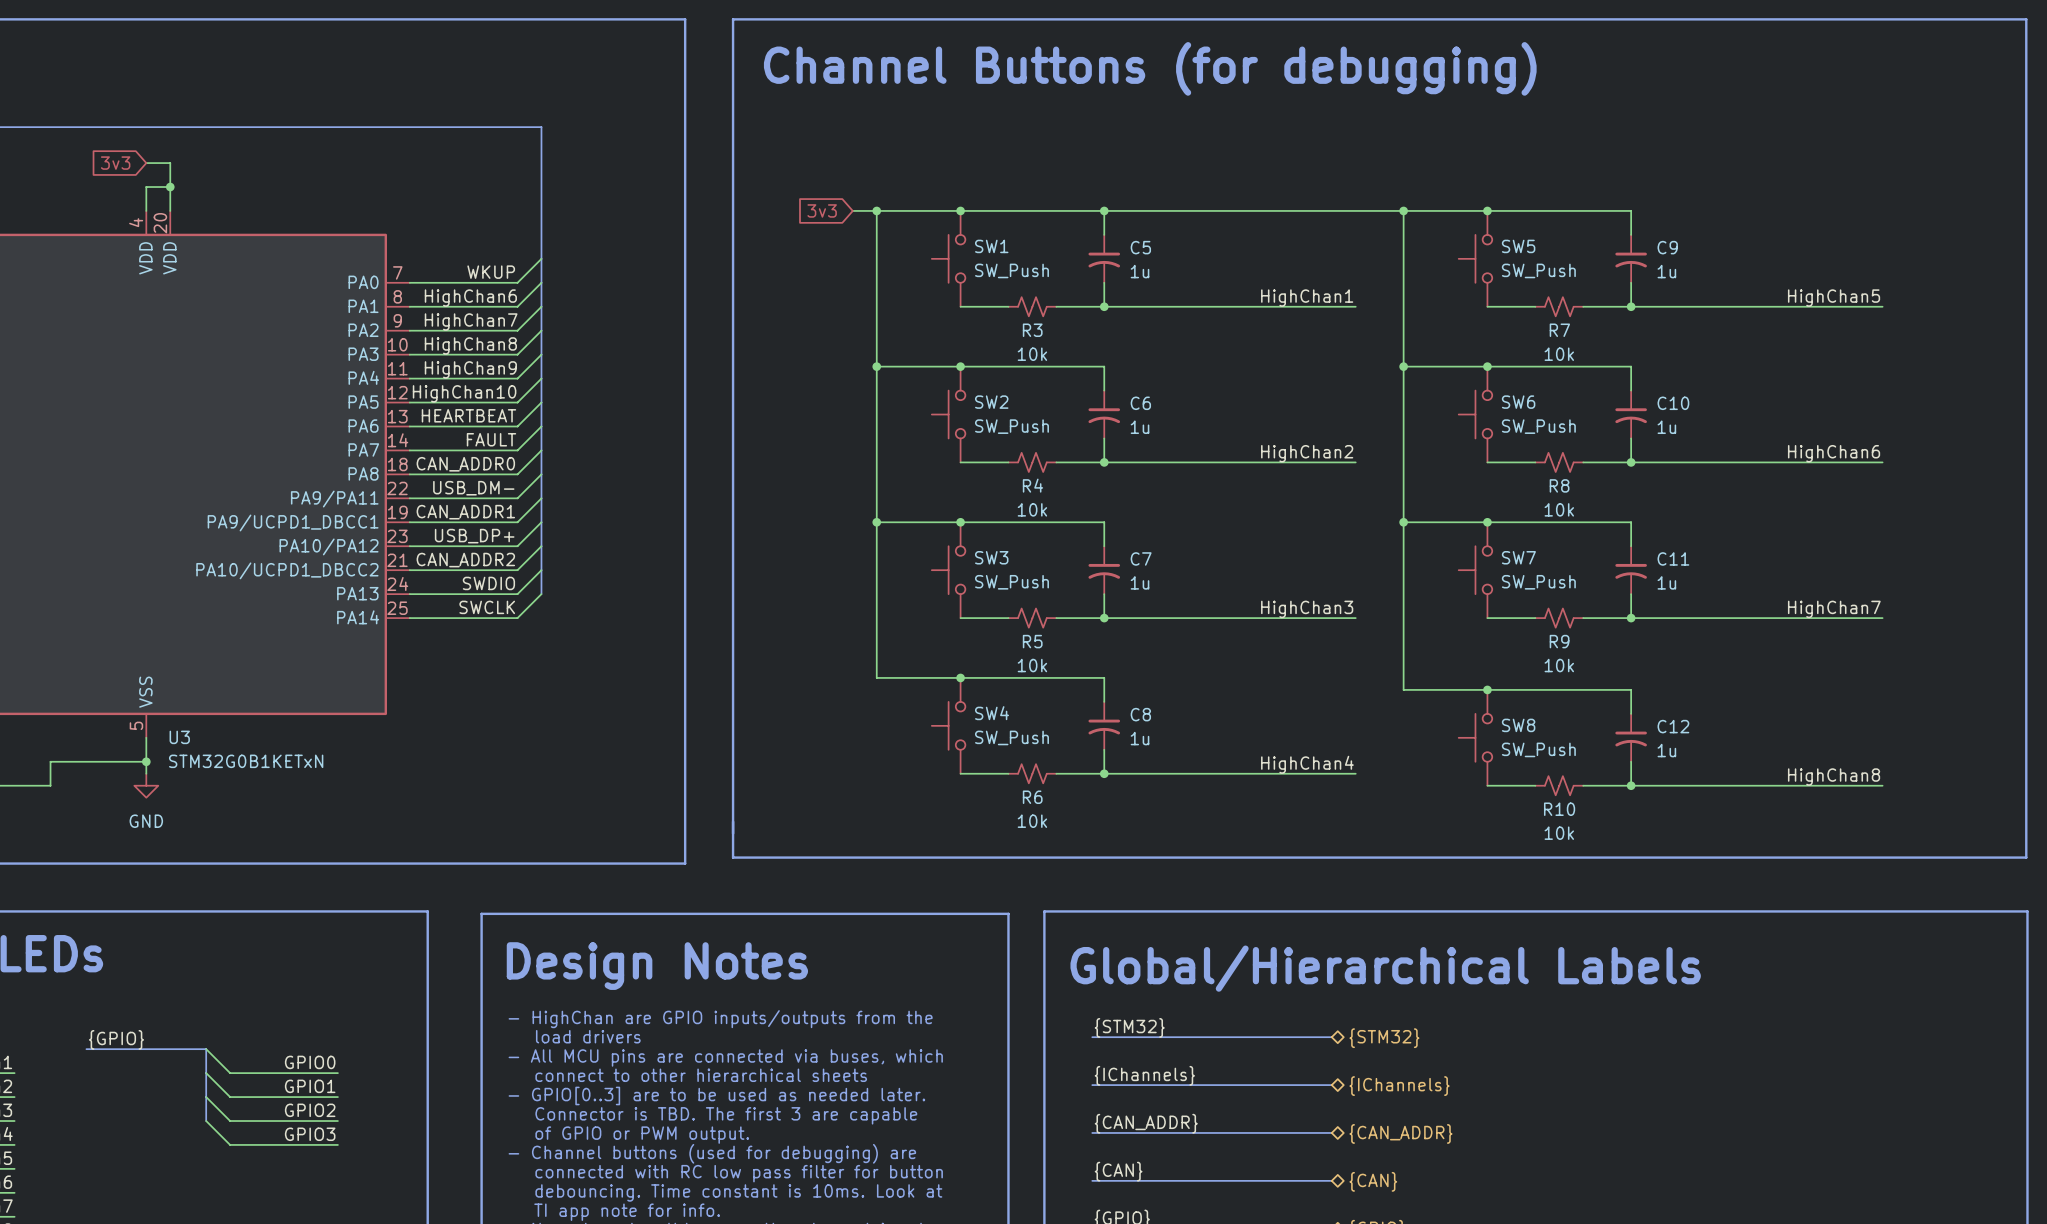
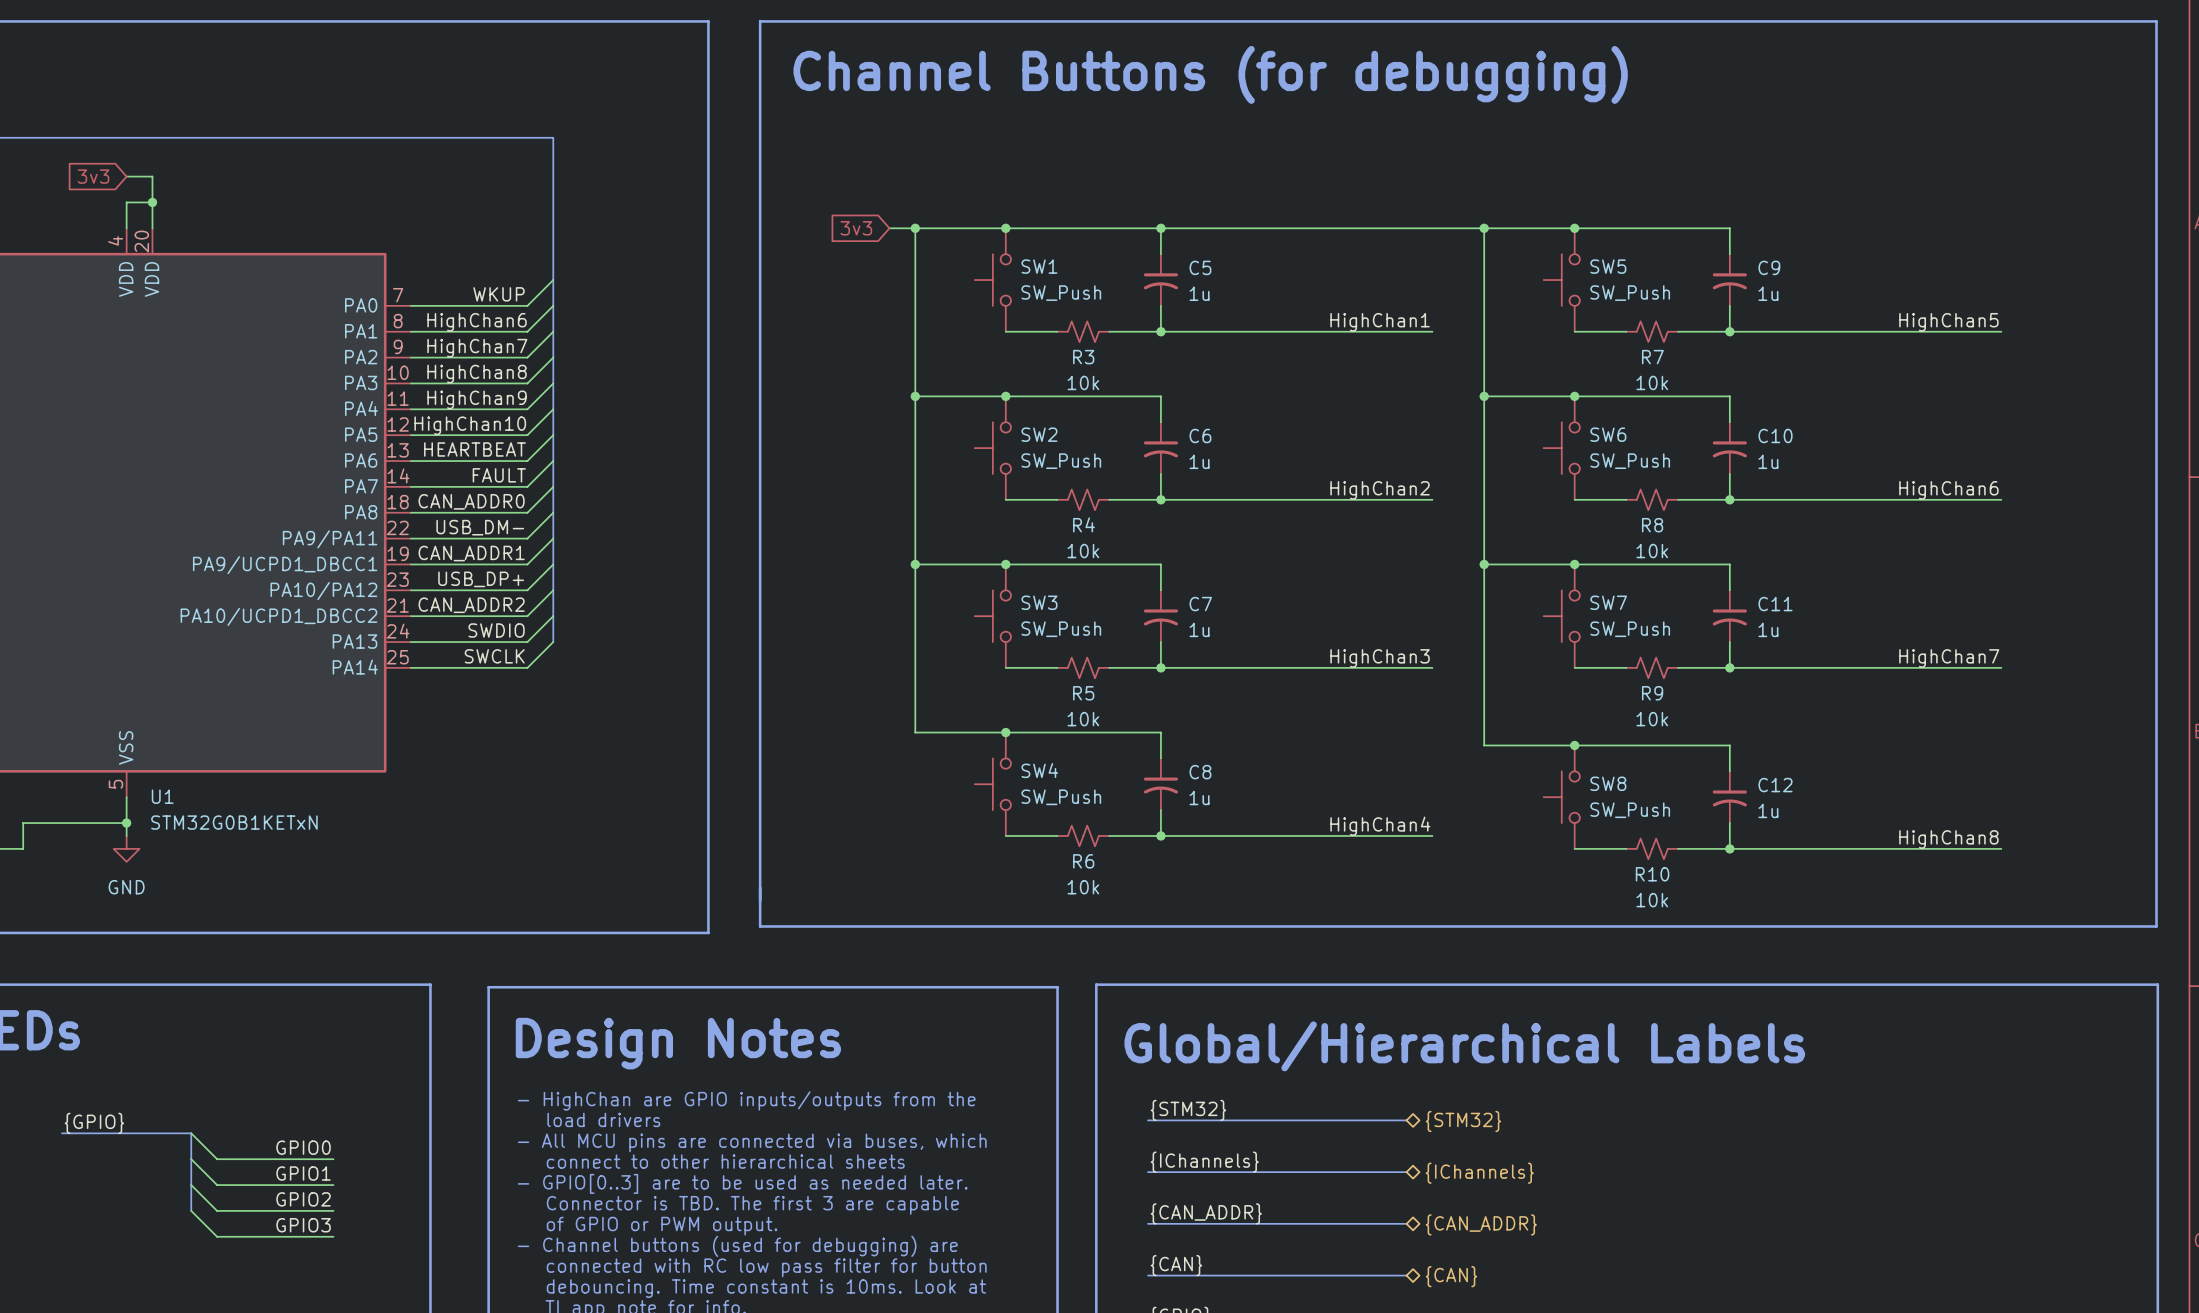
U3 name: U3 (179, 737) -> U1 (162, 796)

